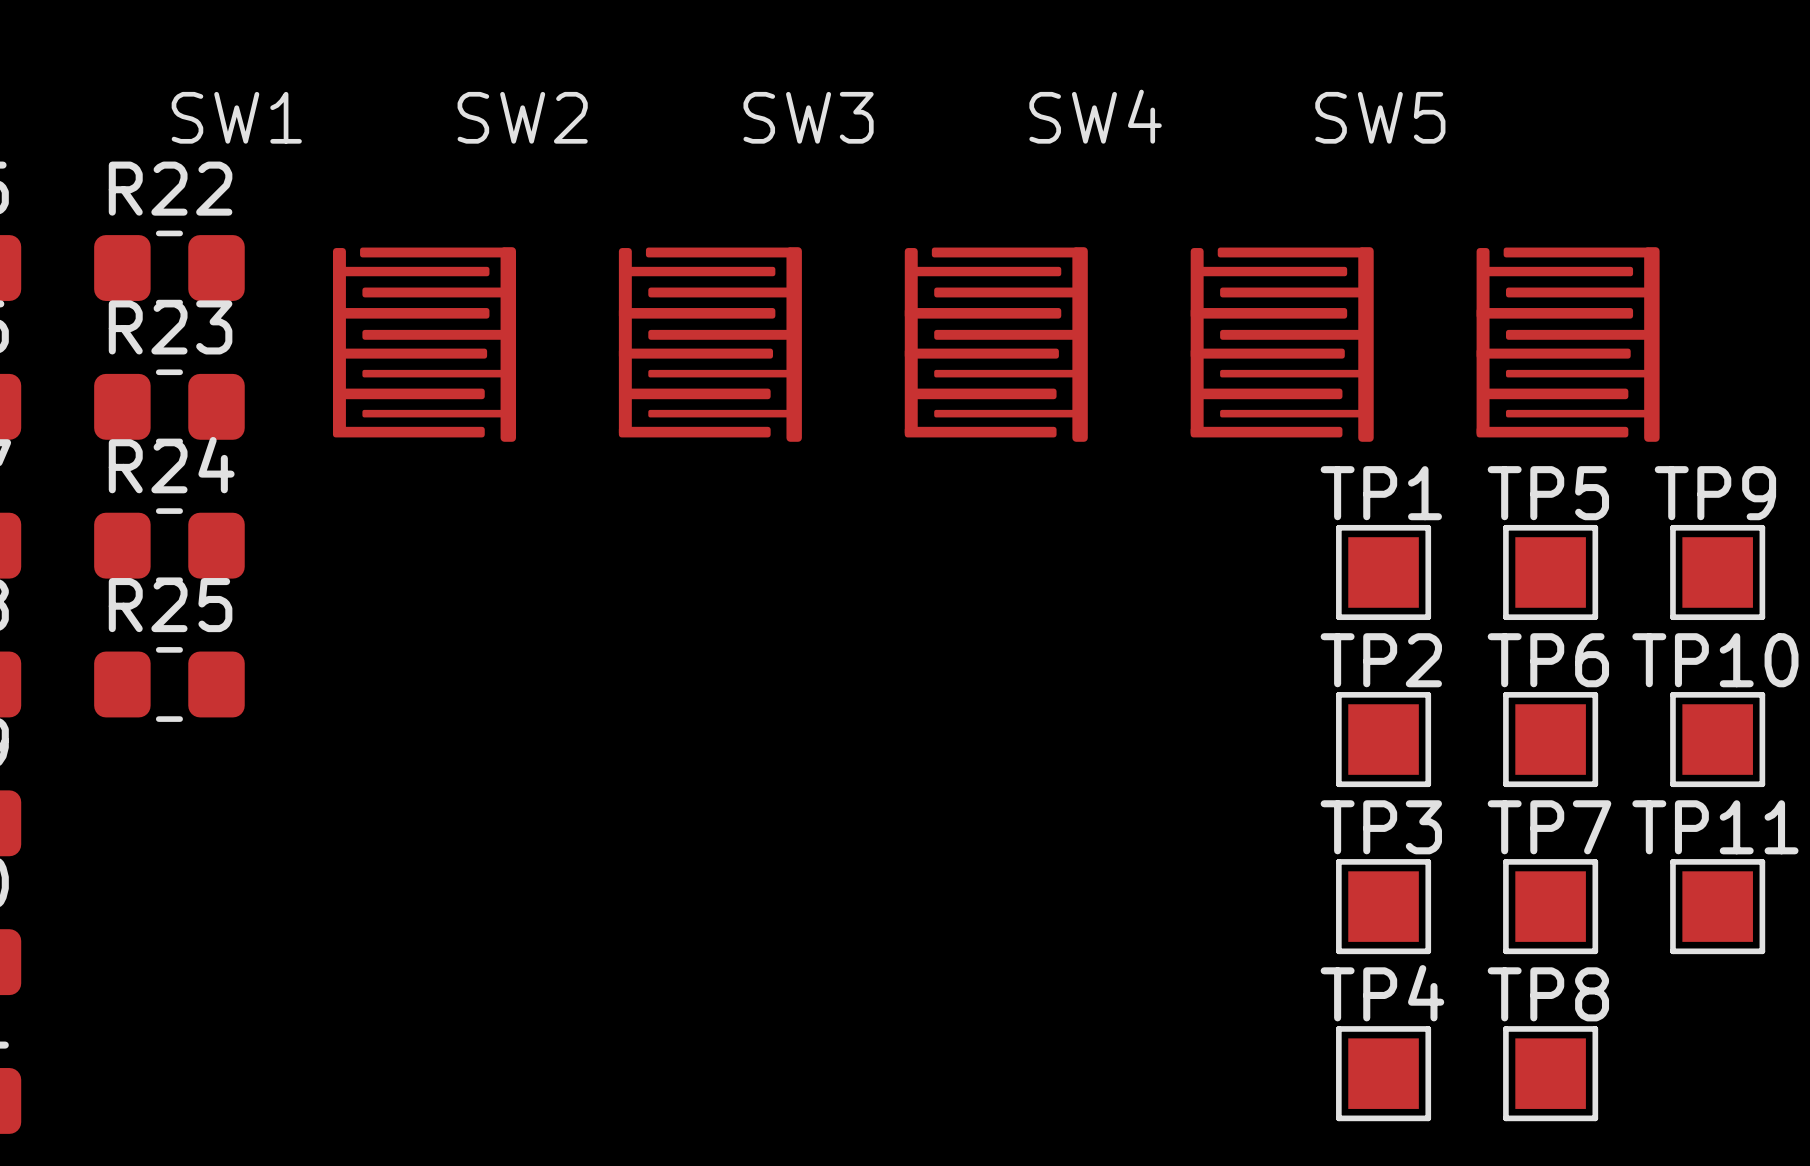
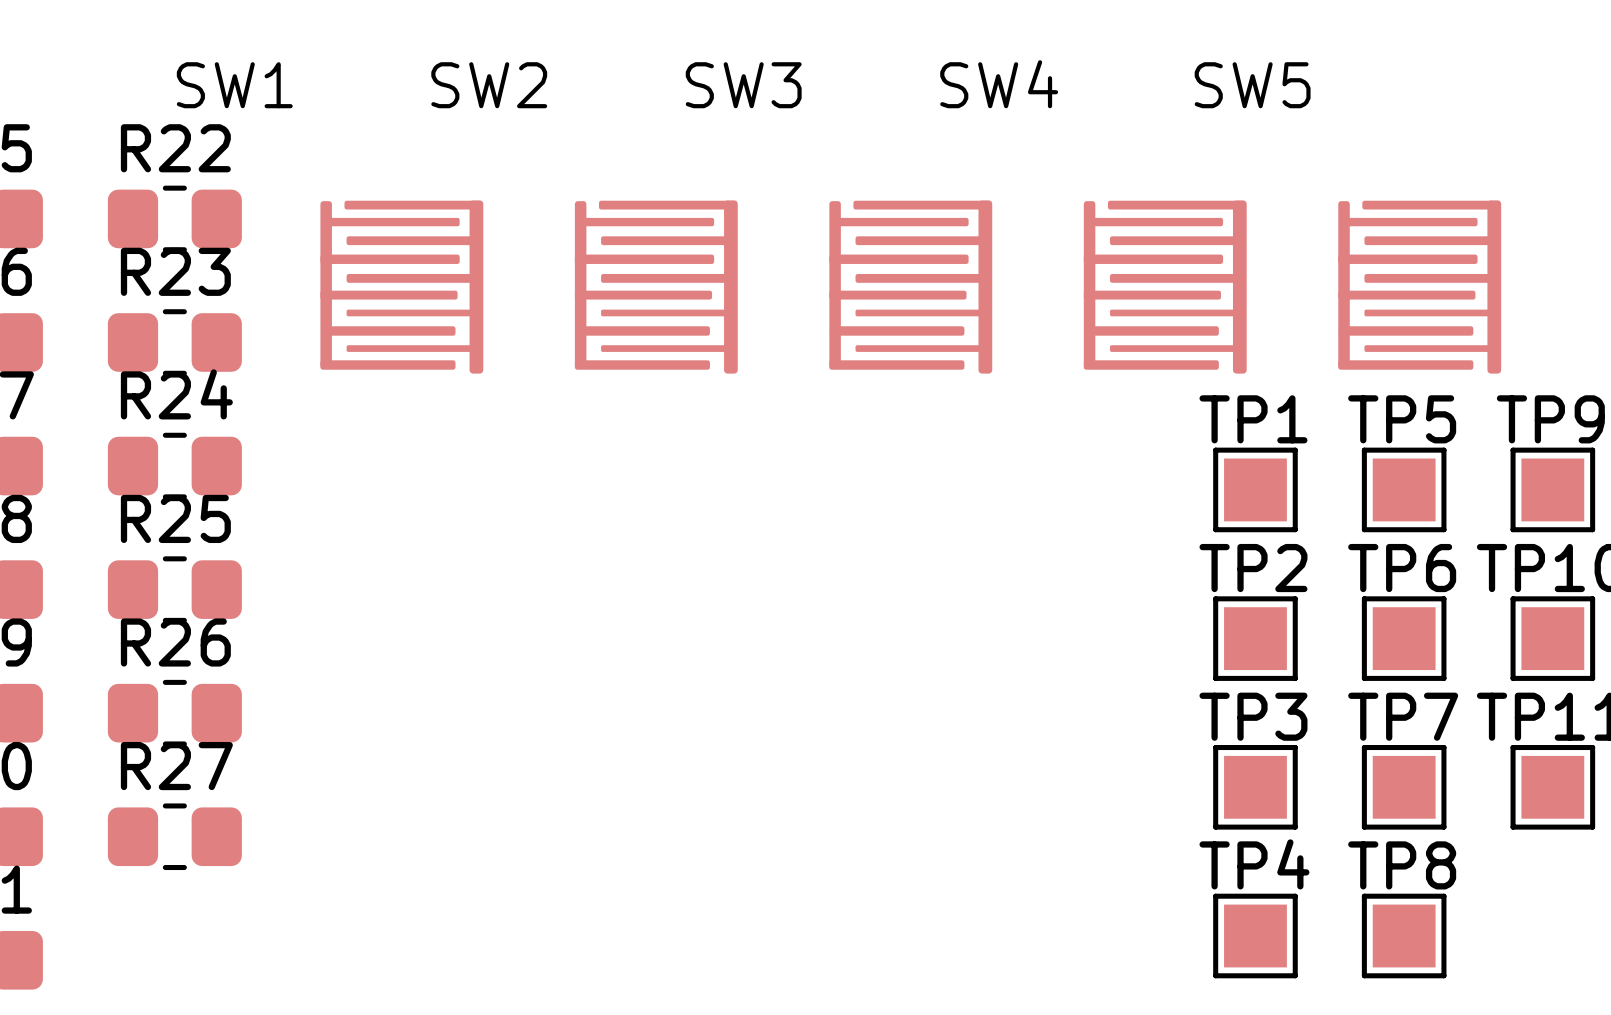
R26: none -> (174, 713)
R27: none -> (174, 836)

